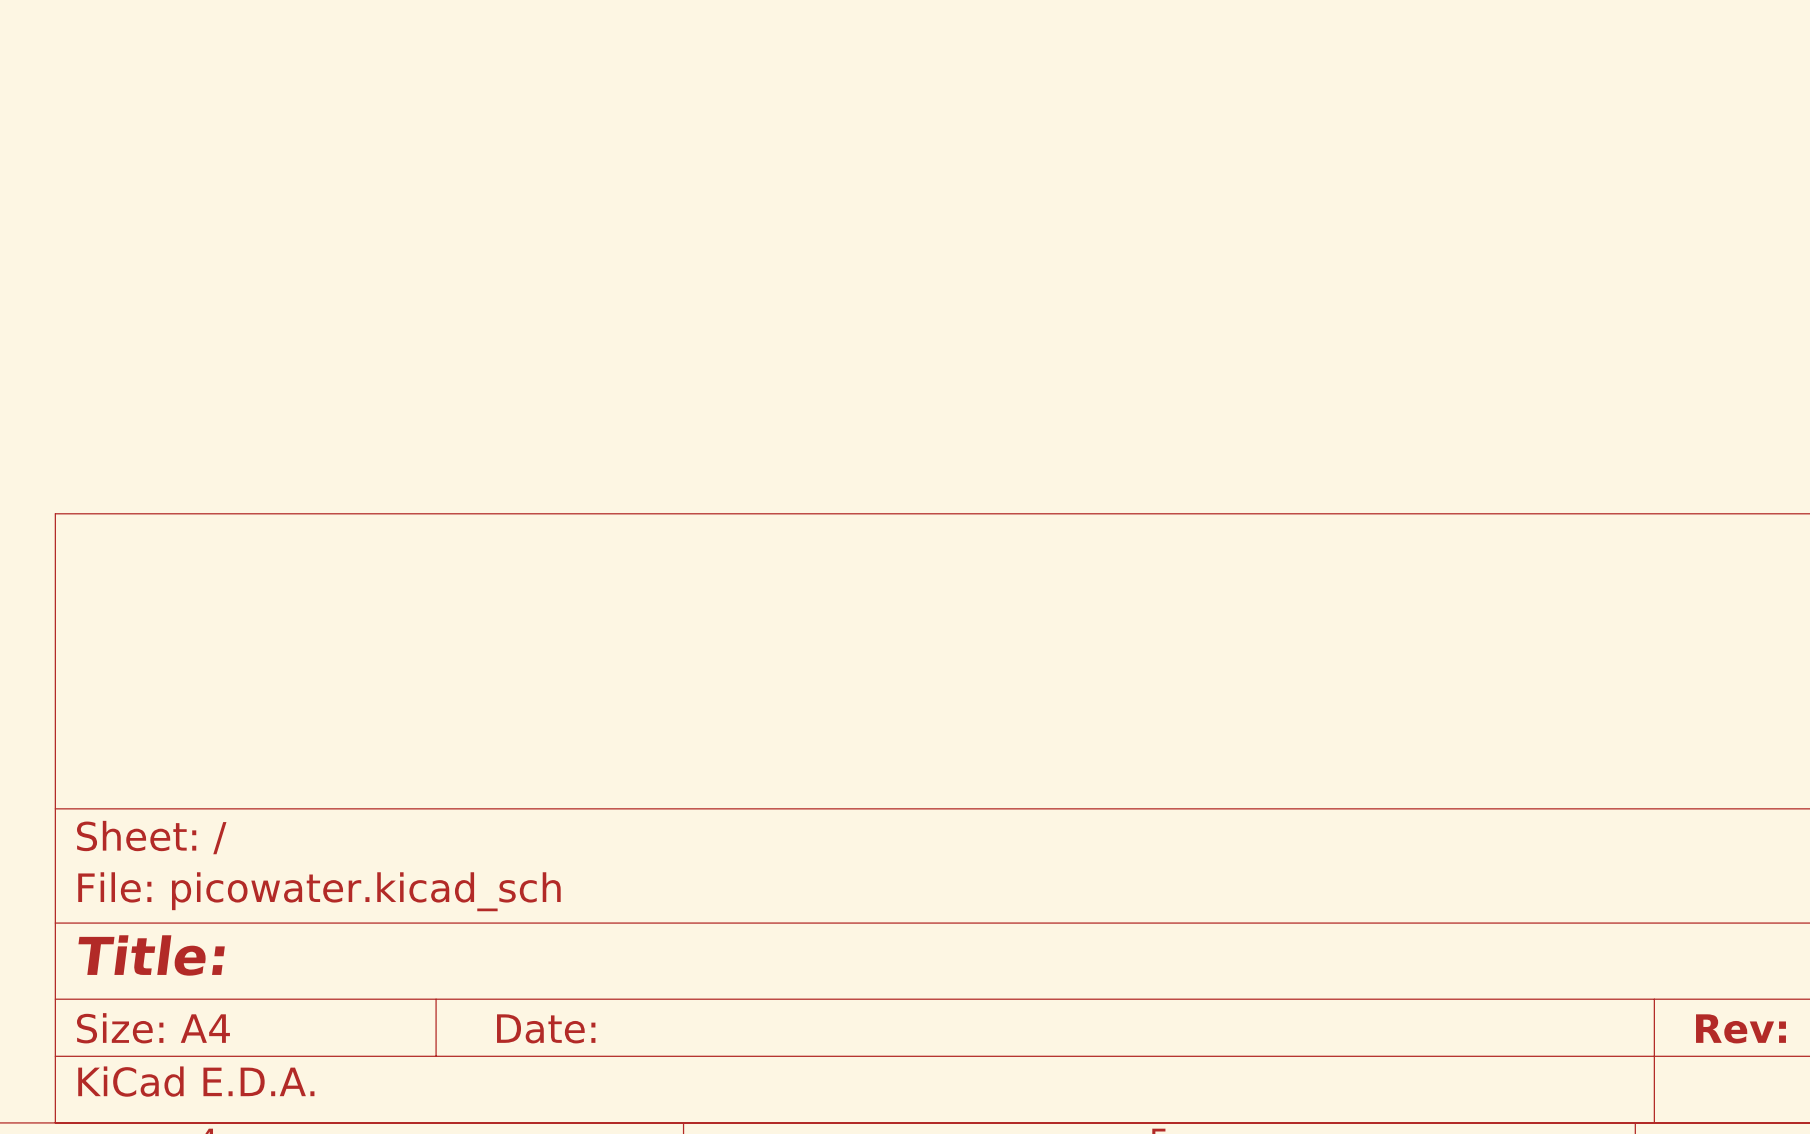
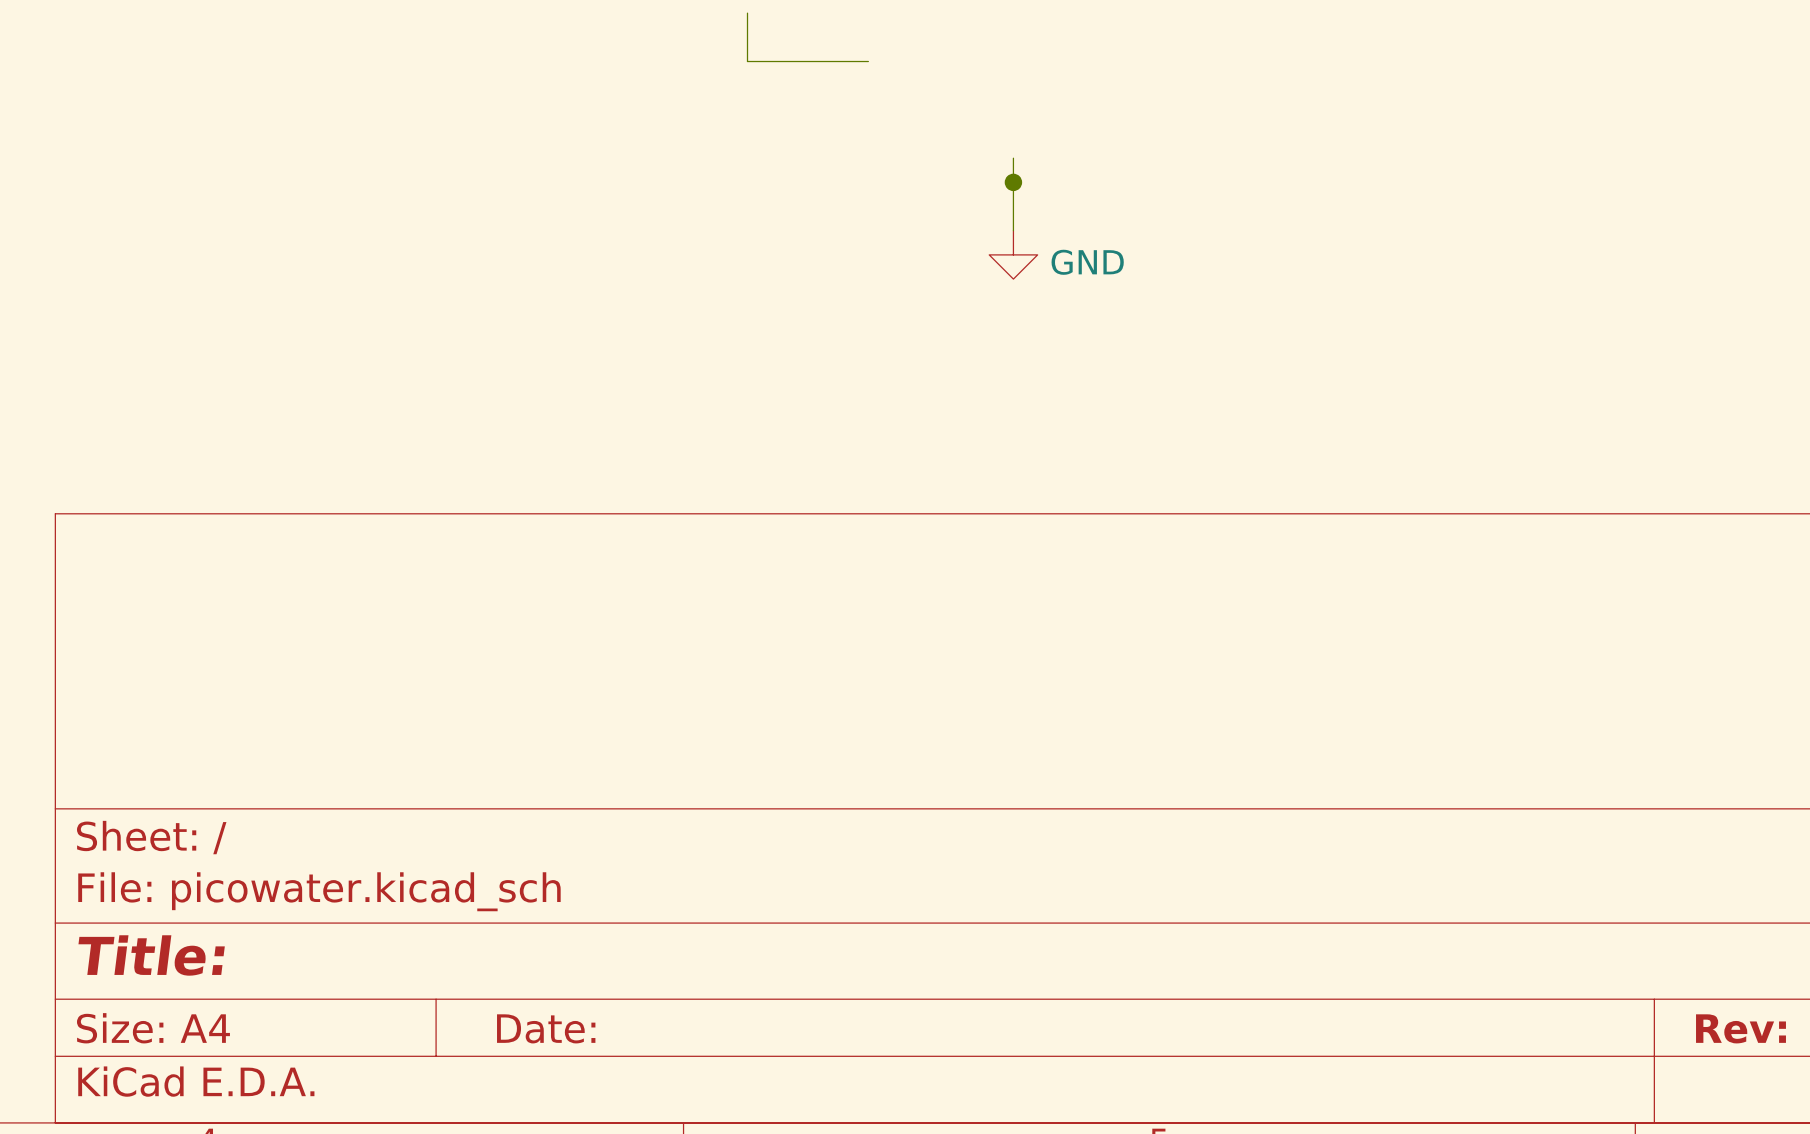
wire: none -> (747, 13) (747, 61) (868, 61)
wire: none -> (1013, 158) (1013, 230)
junction: none -> (1013, 182)
power symbol: none -> GND (1013, 254)

